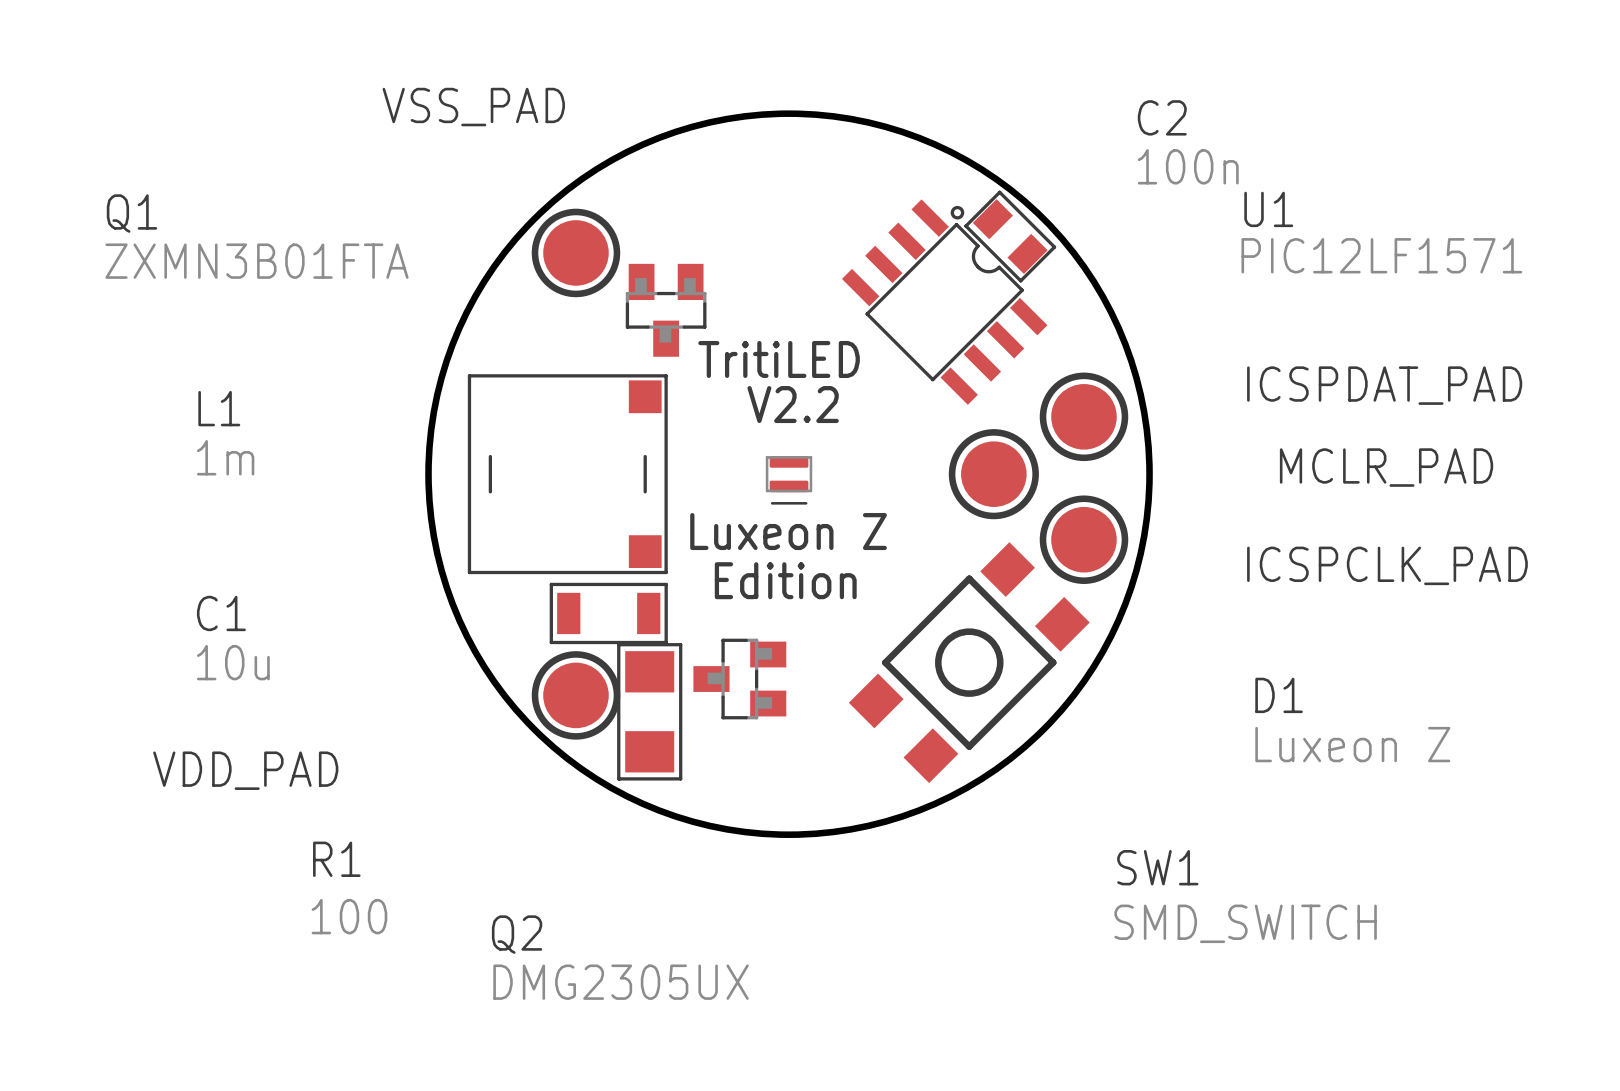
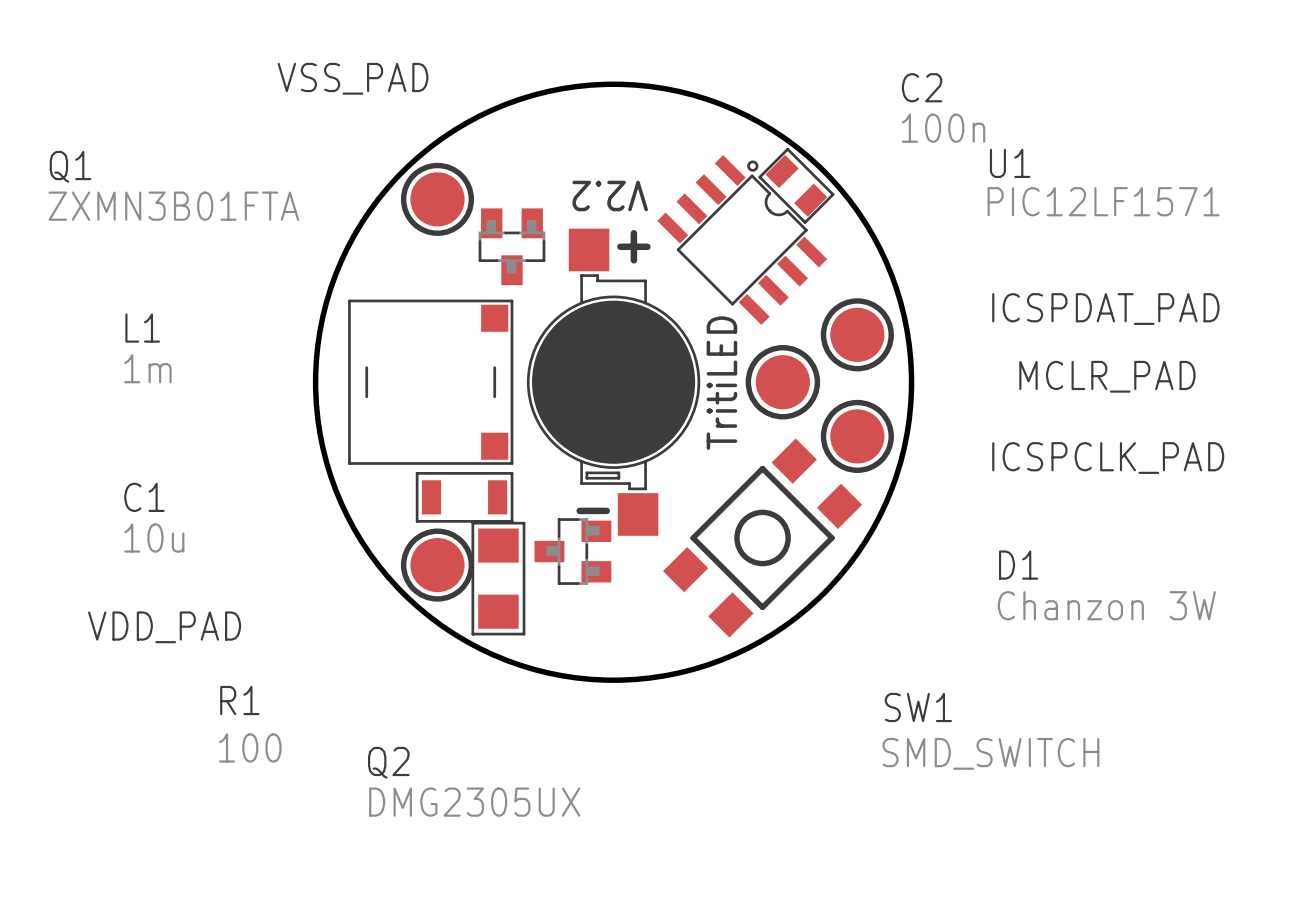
line: none -> (633, 233) (633, 260)
line: none -> (620, 246) (647, 246)
text rotation: 0° (779, 359) -> 90° counterclockwise (721, 383)
drawing: none -> [532, 300, 696, 464]
text rotation: 0° (793, 404) -> 180° (610, 196)
text position: V2.2 (793, 404) -> V2.2 (610, 196)
D1 footprint: [765, 456, 813, 505] -> [526, 228, 701, 536]
text: Luxeon Z (788, 531) -> none
text: Edition (785, 580) -> none
line: none -> (579, 510) (606, 510)
D1 value: Luxeon Z (1352, 744) -> Chanzon 3W (1106, 605)

